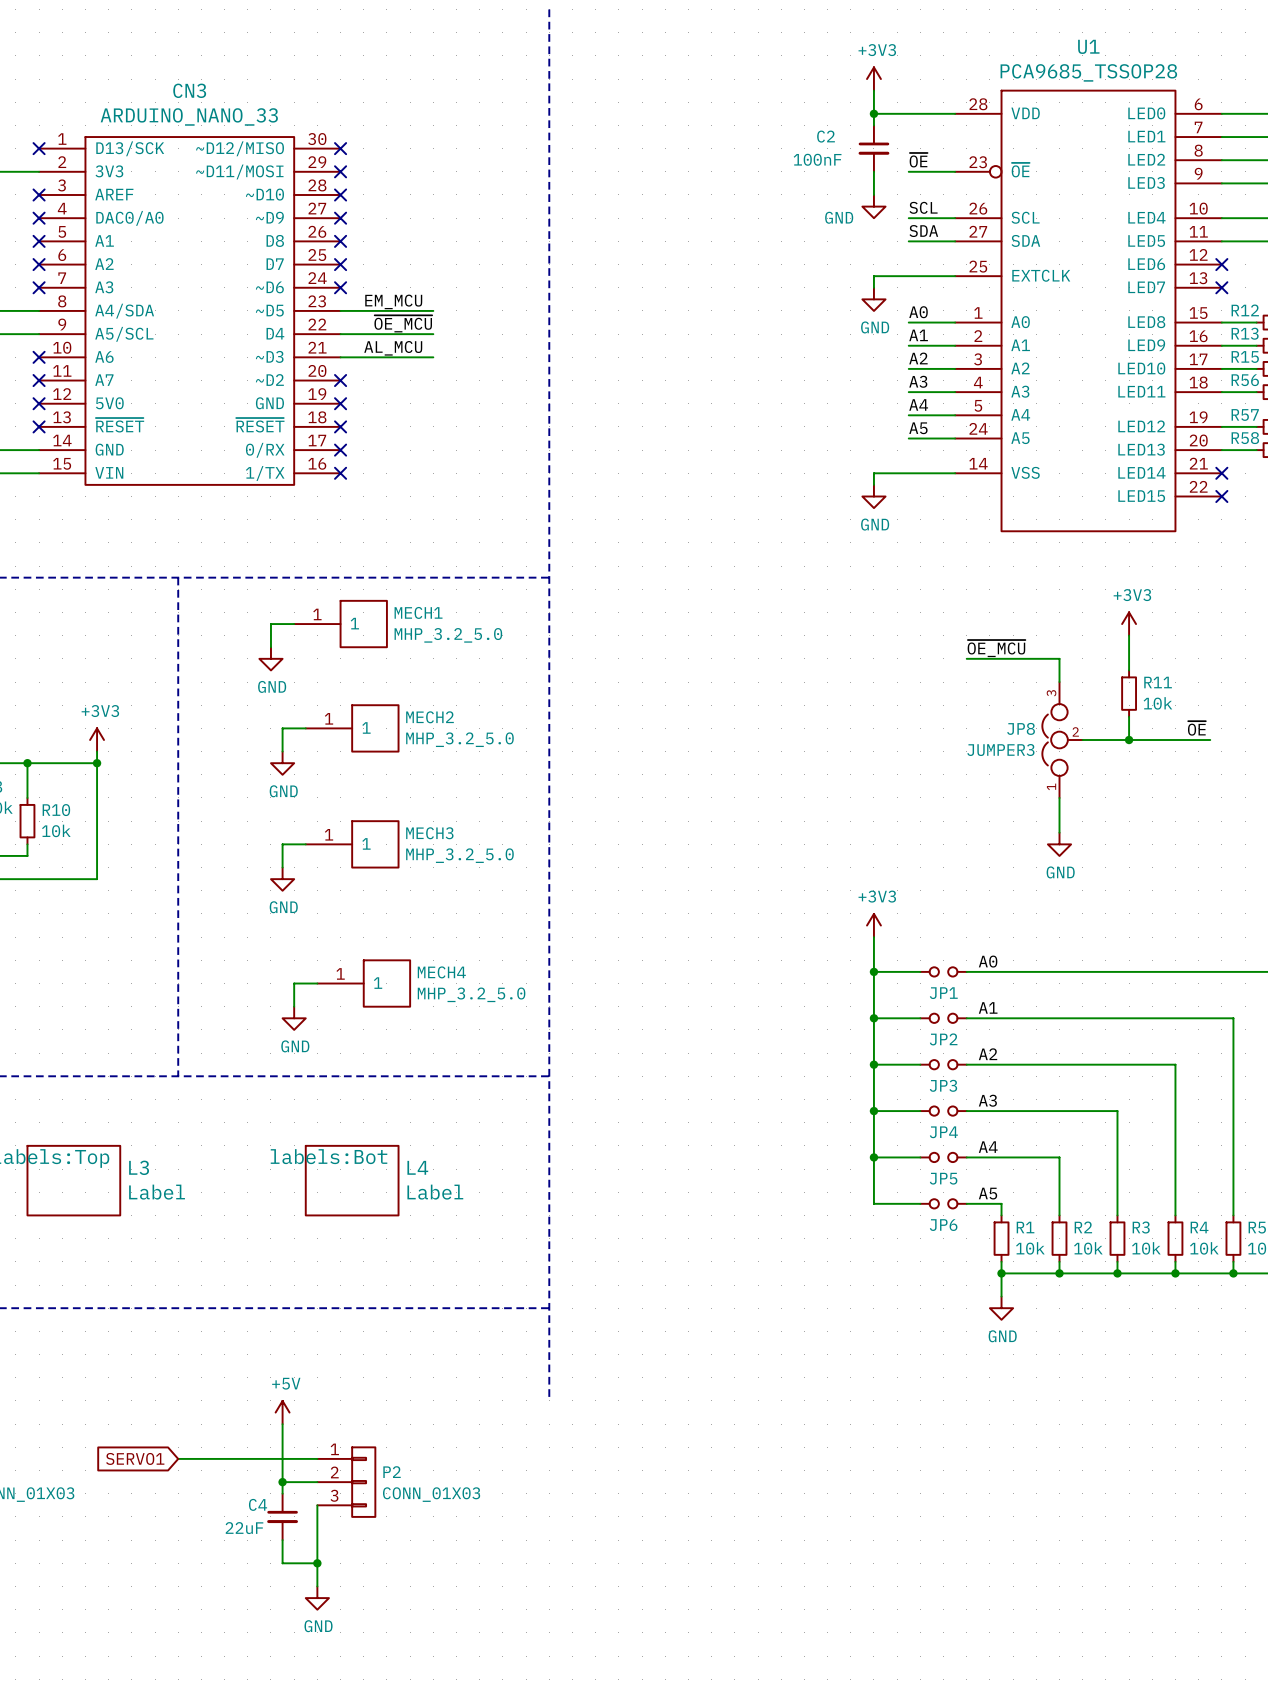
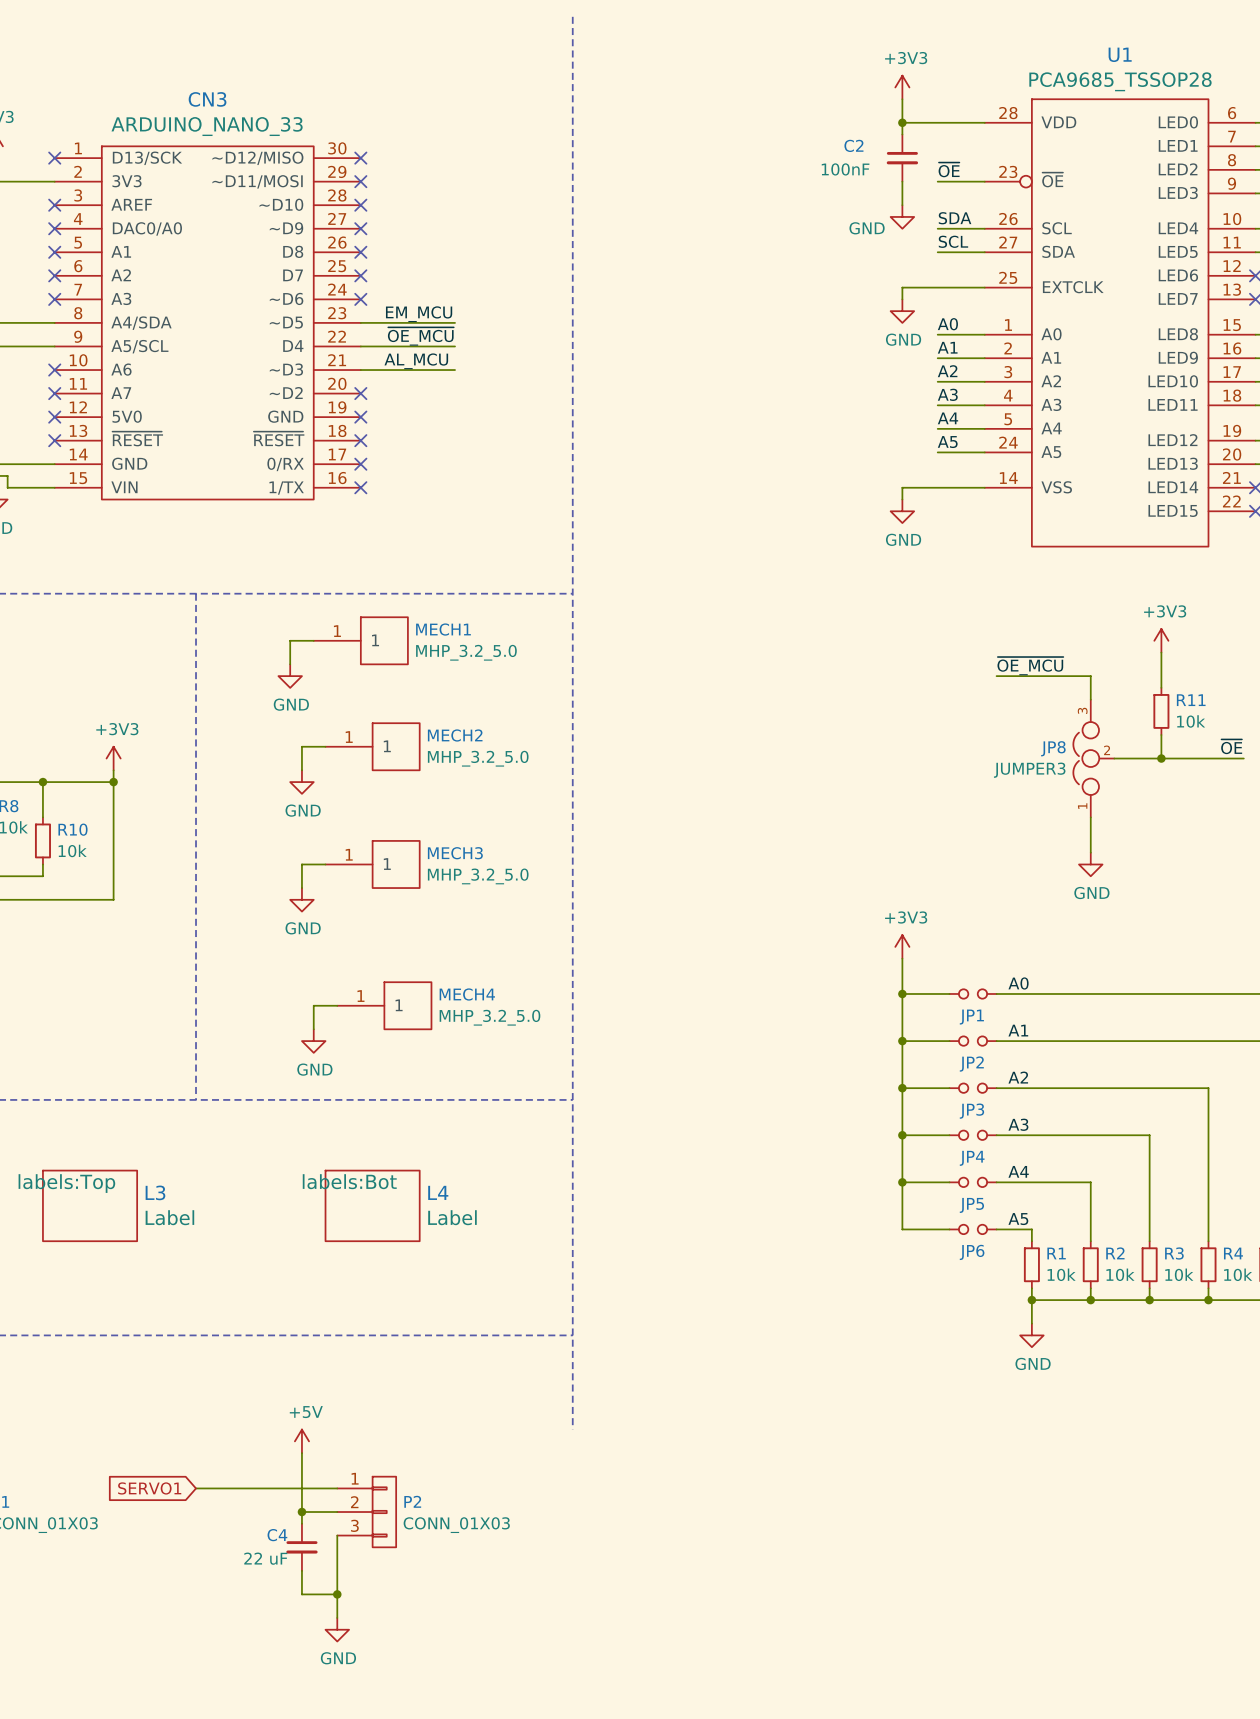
label: SCL (923, 207) -> SDA (955, 218)
label: SDA (923, 231) -> SCL (953, 241)
C4 value: 22uF (244, 1528) -> 22 uF (265, 1558)

